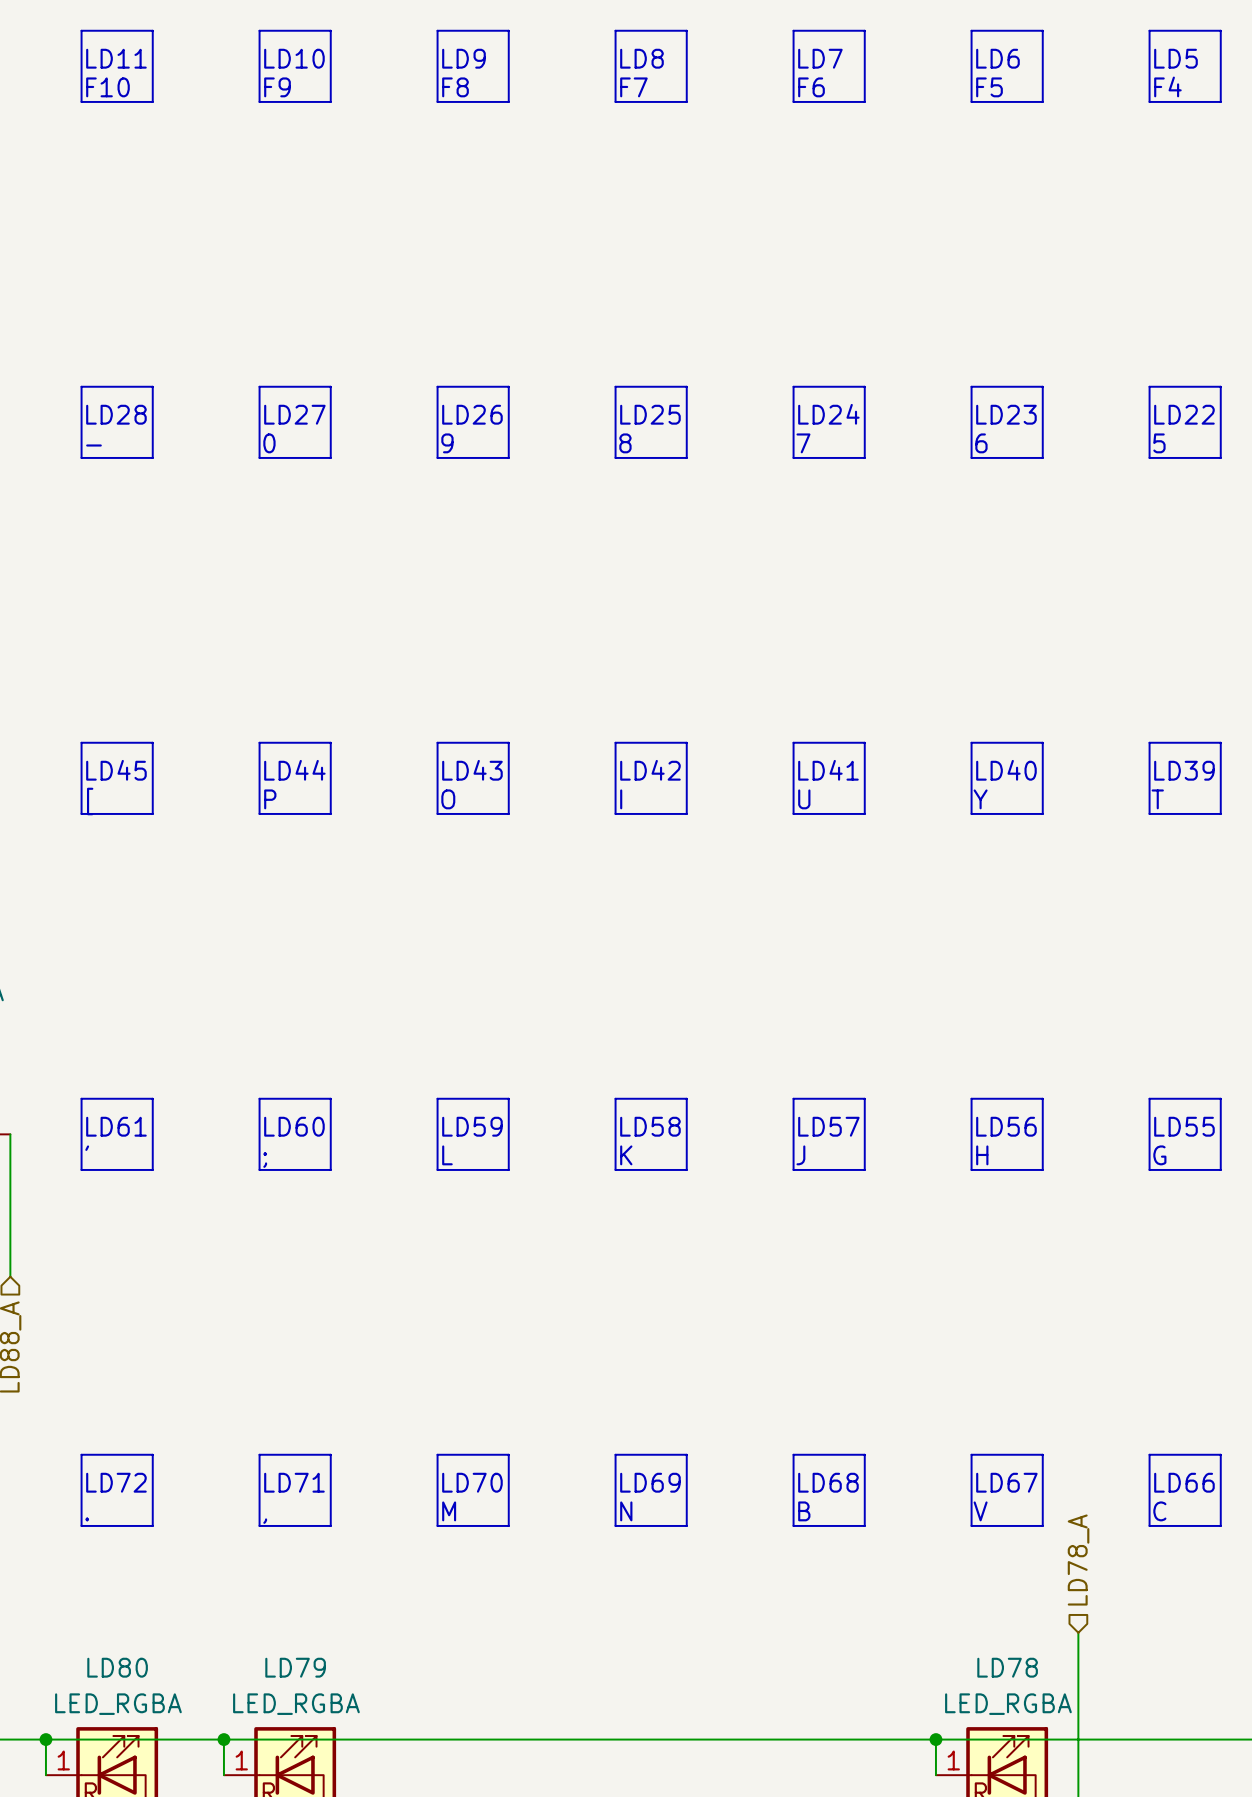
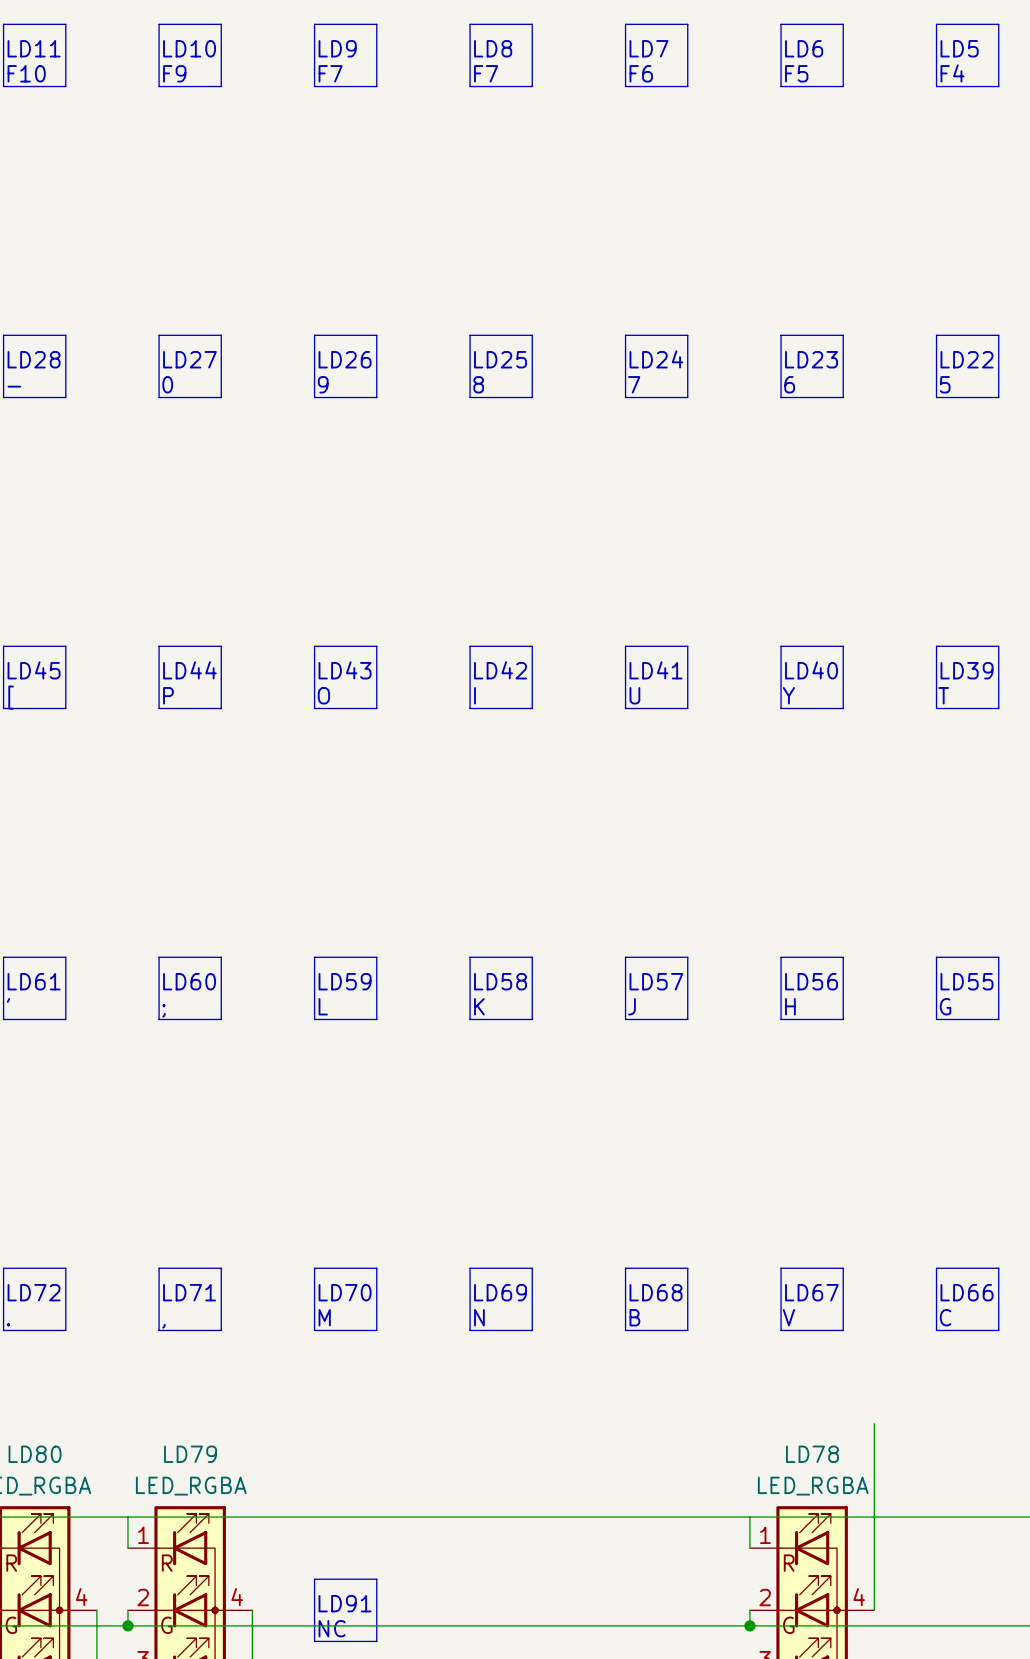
text: F8 (455, 87) -> F7 (330, 73)
hierarchical label: LD78_A (1078, 1560) -> none
junction: (223, 1739) -> none
junction: (935, 1739) -> none

